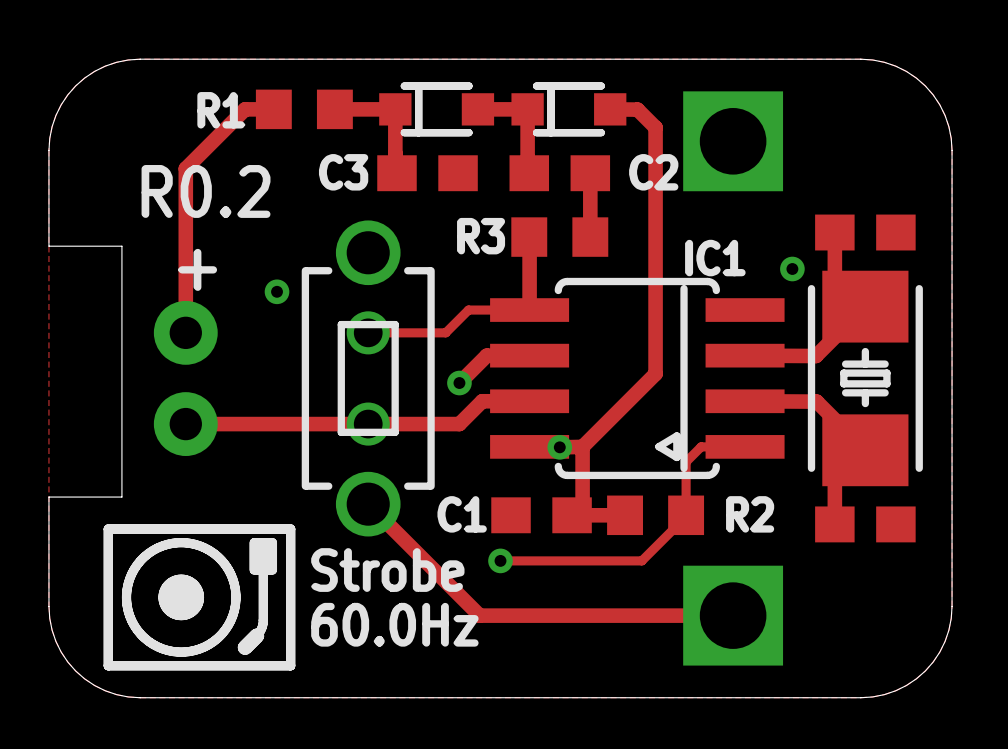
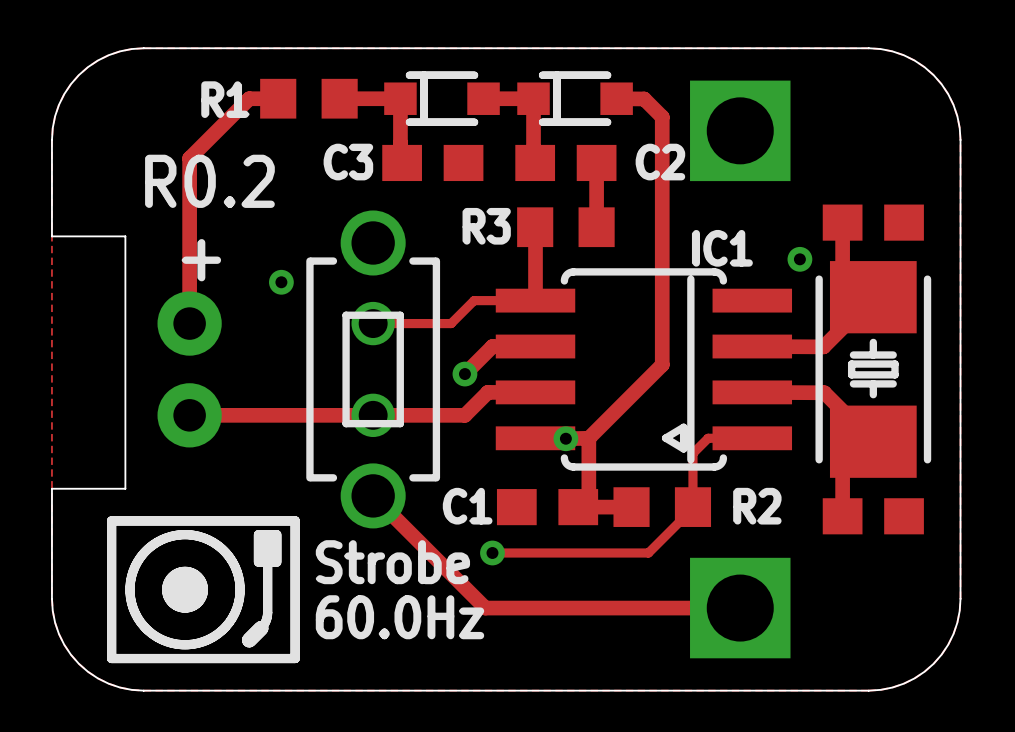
via position: (500, 560) -> (492, 553)

